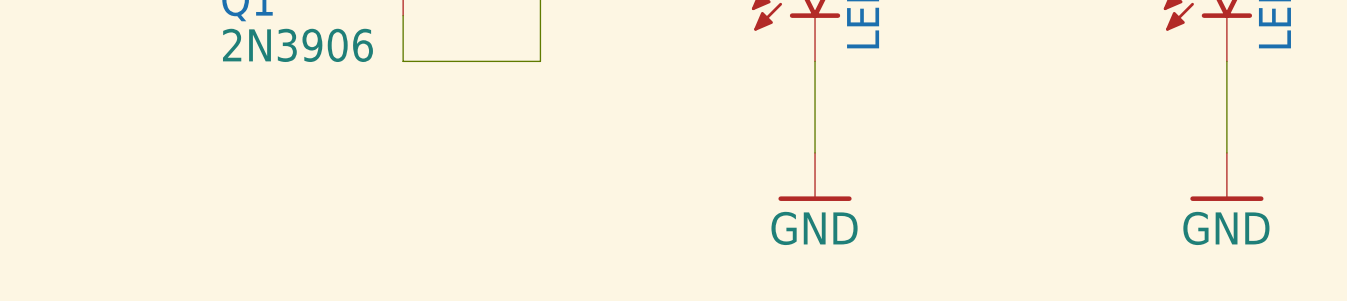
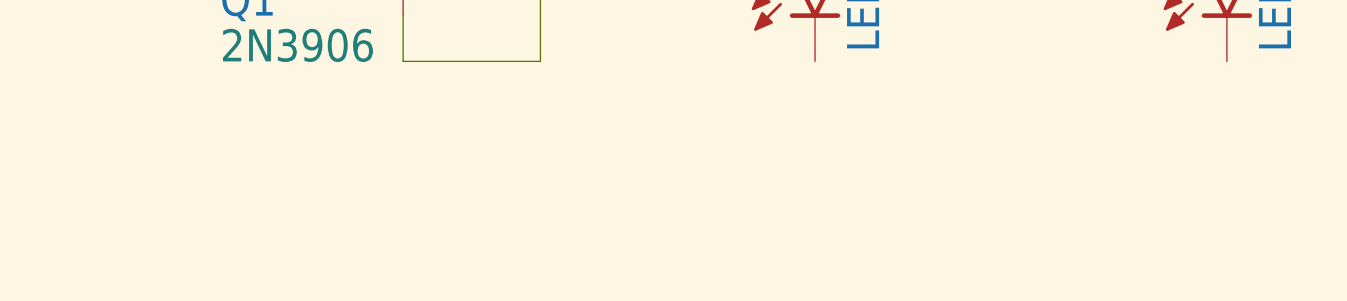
wire: (815, 61) (815, 152) -> none
wire: (1226, 61) (1226, 152) -> none
power symbol: GND (815, 176) -> none
power symbol: GND (1226, 176) -> none

